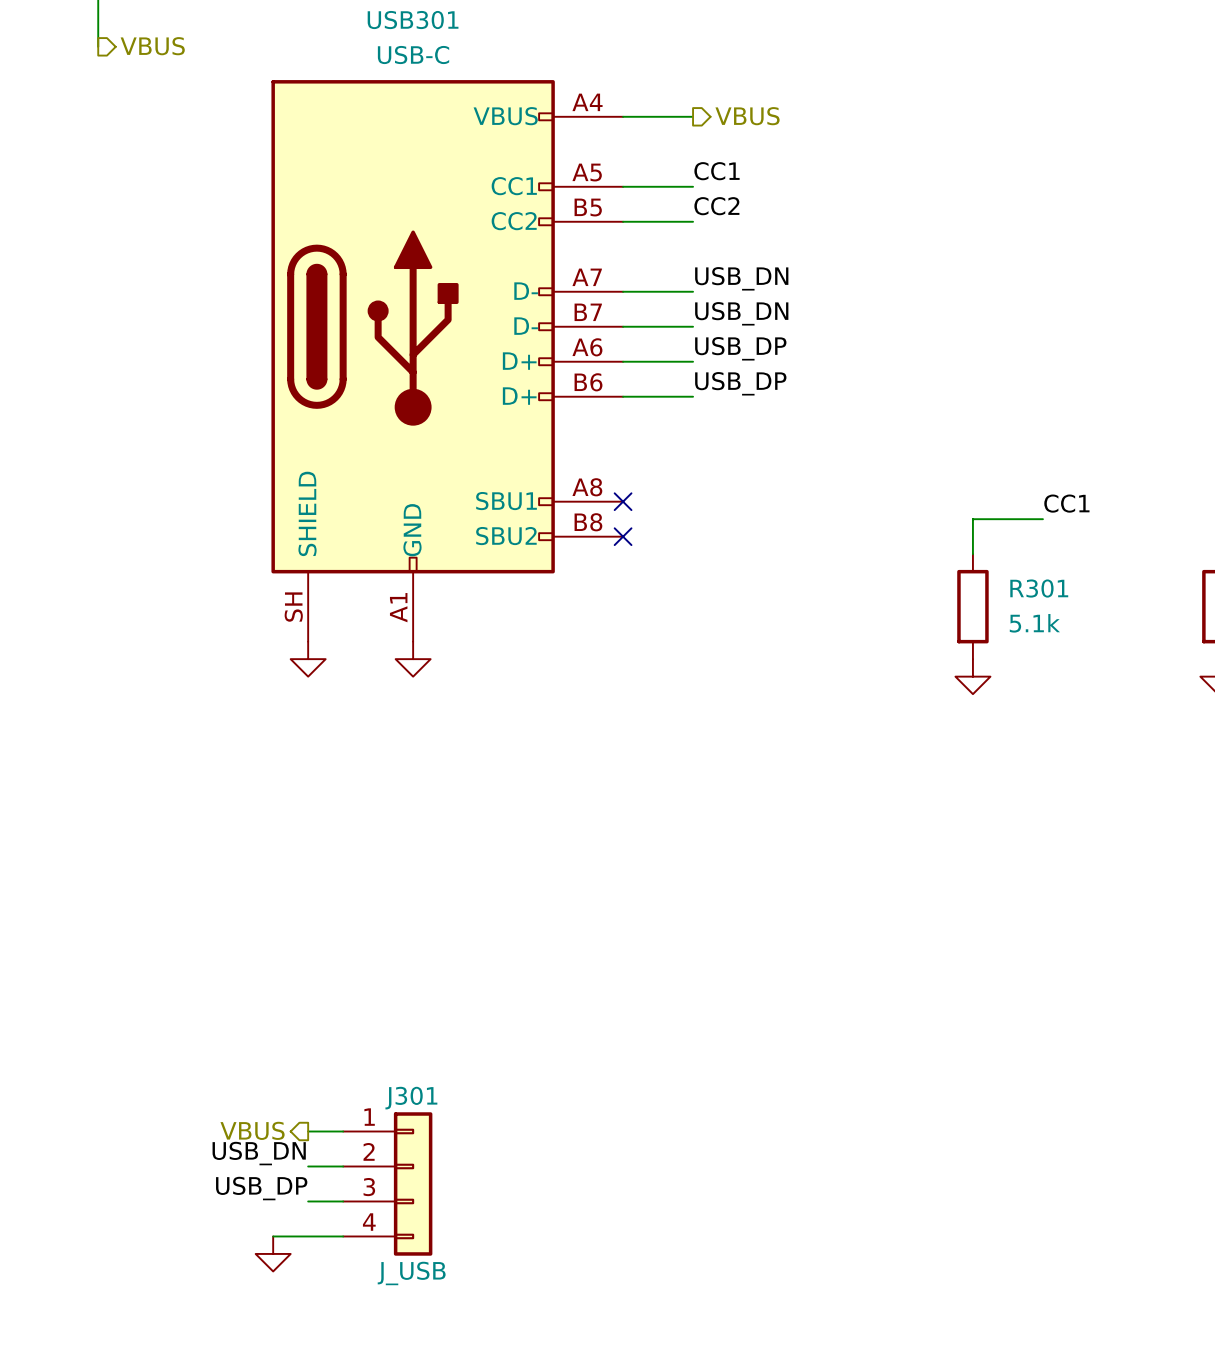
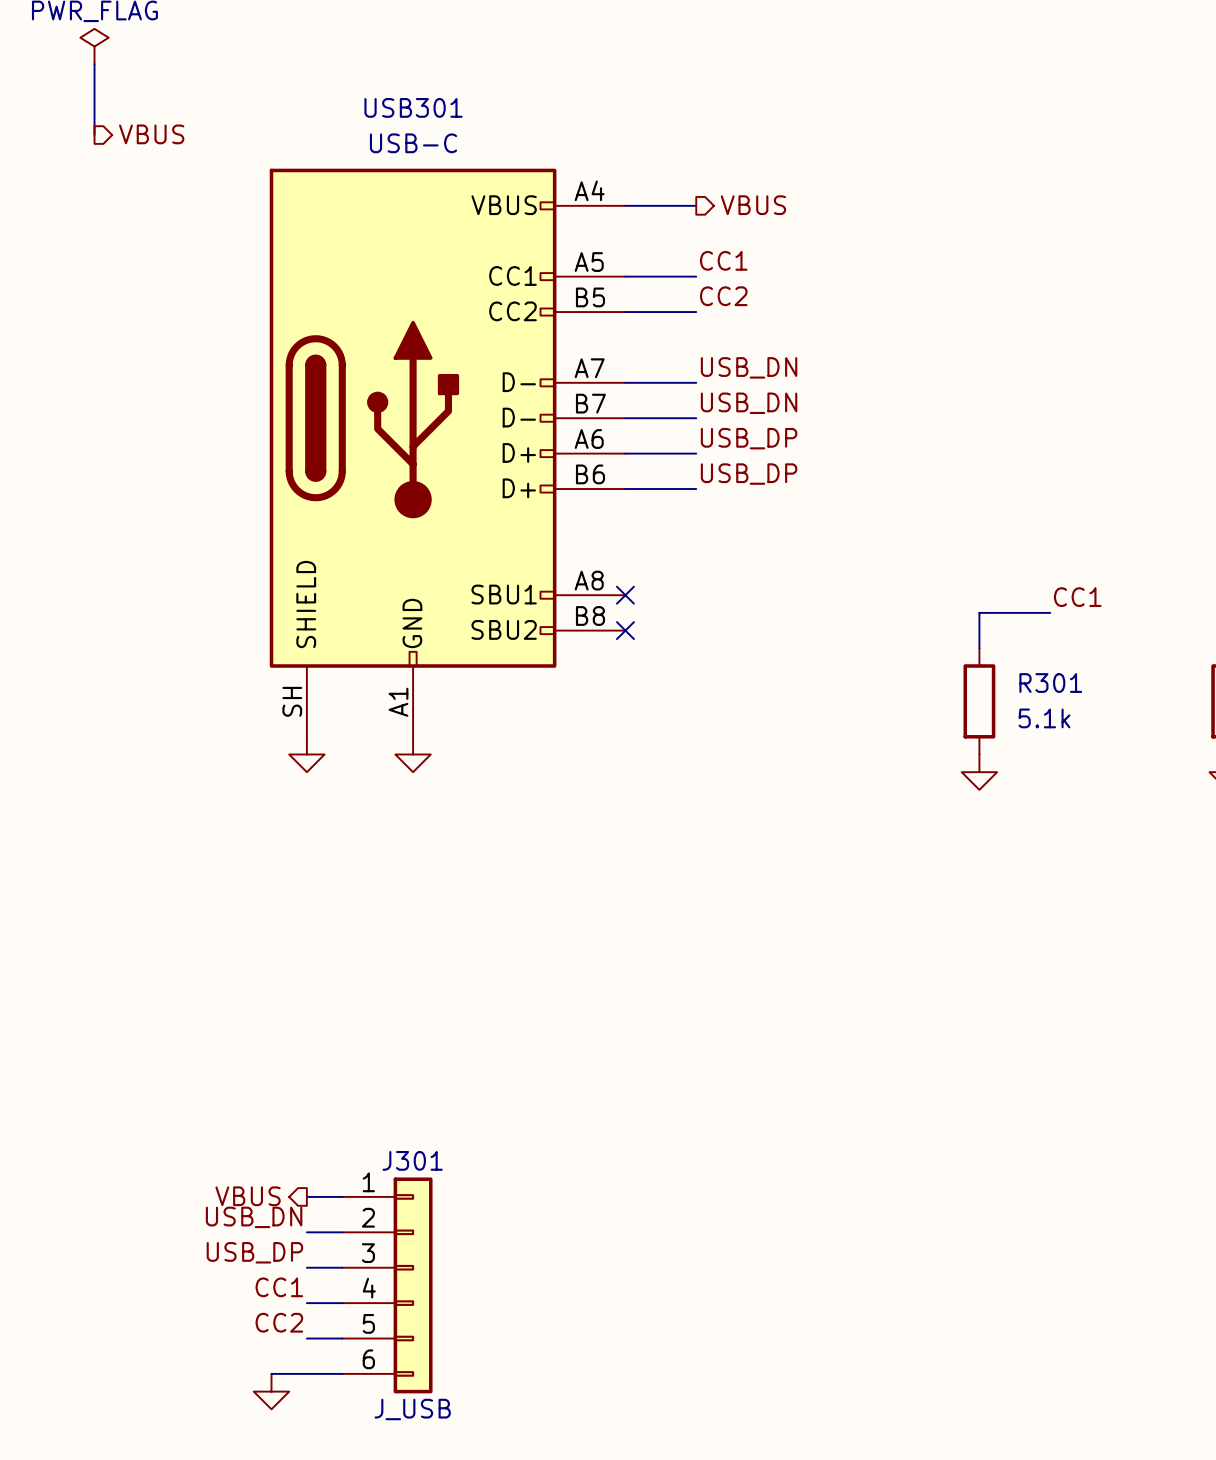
J301 name position: J301 (411, 1098) -> J301 (412, 1160)
J301 symbol: [343, 1112, 433, 1256] -> [342, 1177, 433, 1394]
label: none -> USB_DN (254, 1217)
hierarchical label position: VBUS (252, 1130) -> VBUS (248, 1196)
label: USB_DN (259, 1153) -> USB_DP (254, 1252)
label: USB_DP (261, 1188) -> CC1 (279, 1287)
label: none -> CC2 (279, 1322)
wire: (273, 1236) (308, 1236) -> (306, 1196) (342, 1196)
power symbol position: (273, 1253) -> (271, 1391)
wire: none -> (271, 1373) (342, 1373)
J301 value position: J_USB (411, 1273) -> J_USB (412, 1409)

